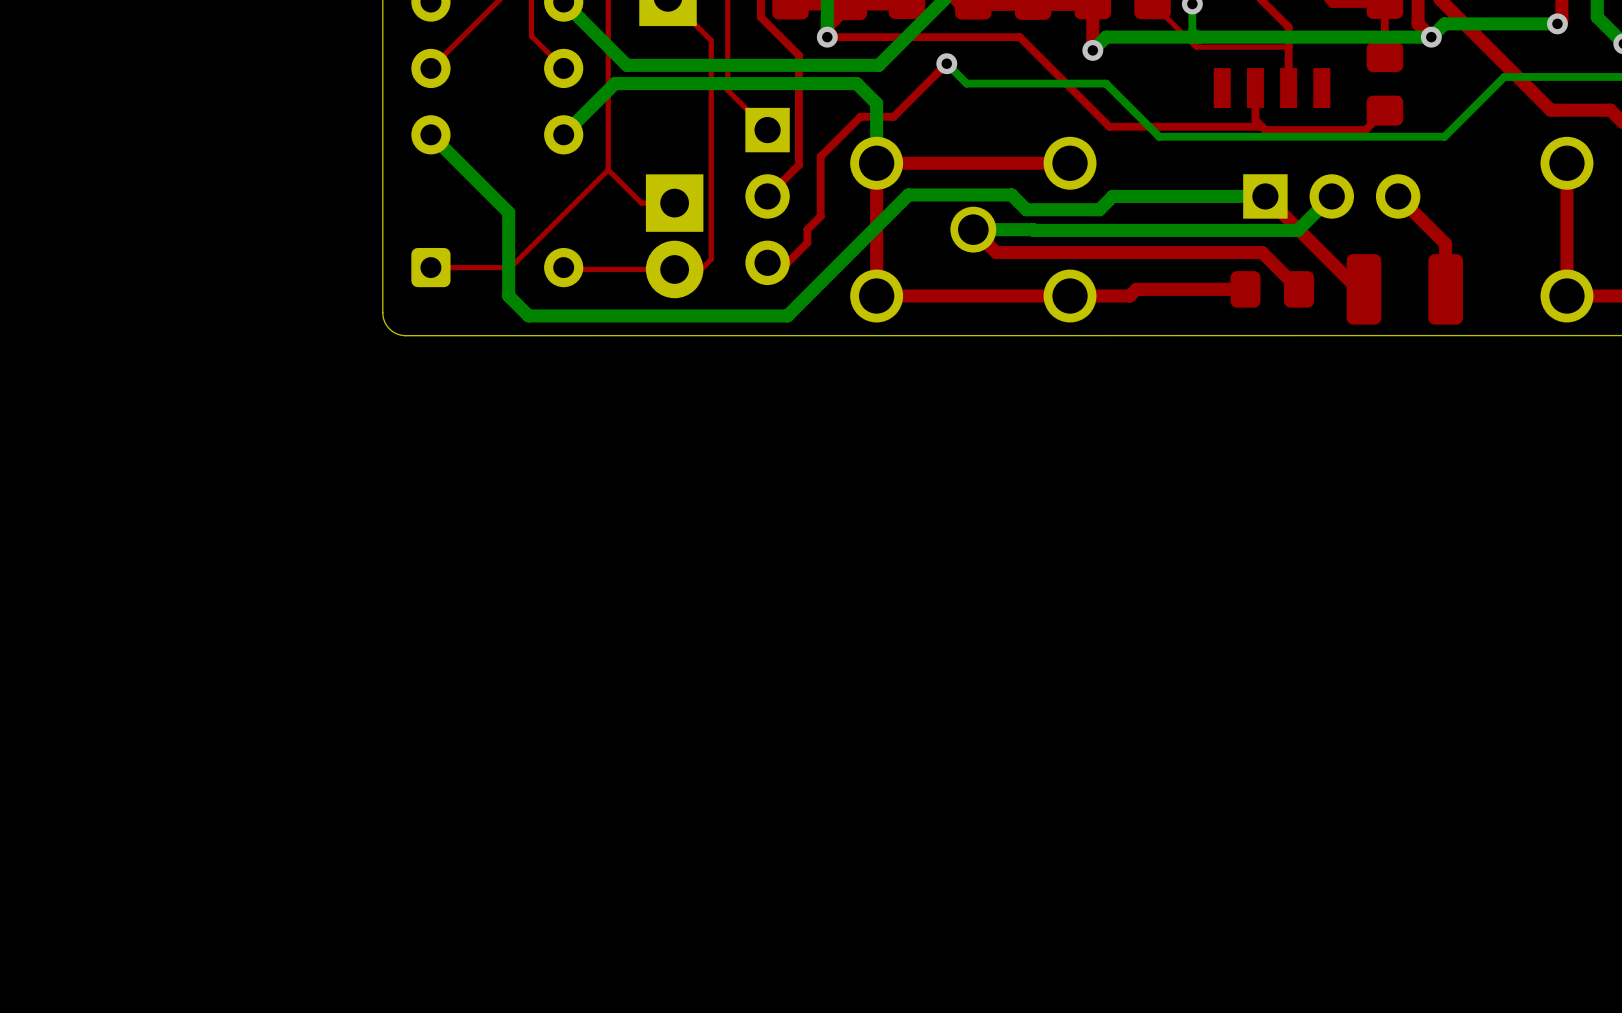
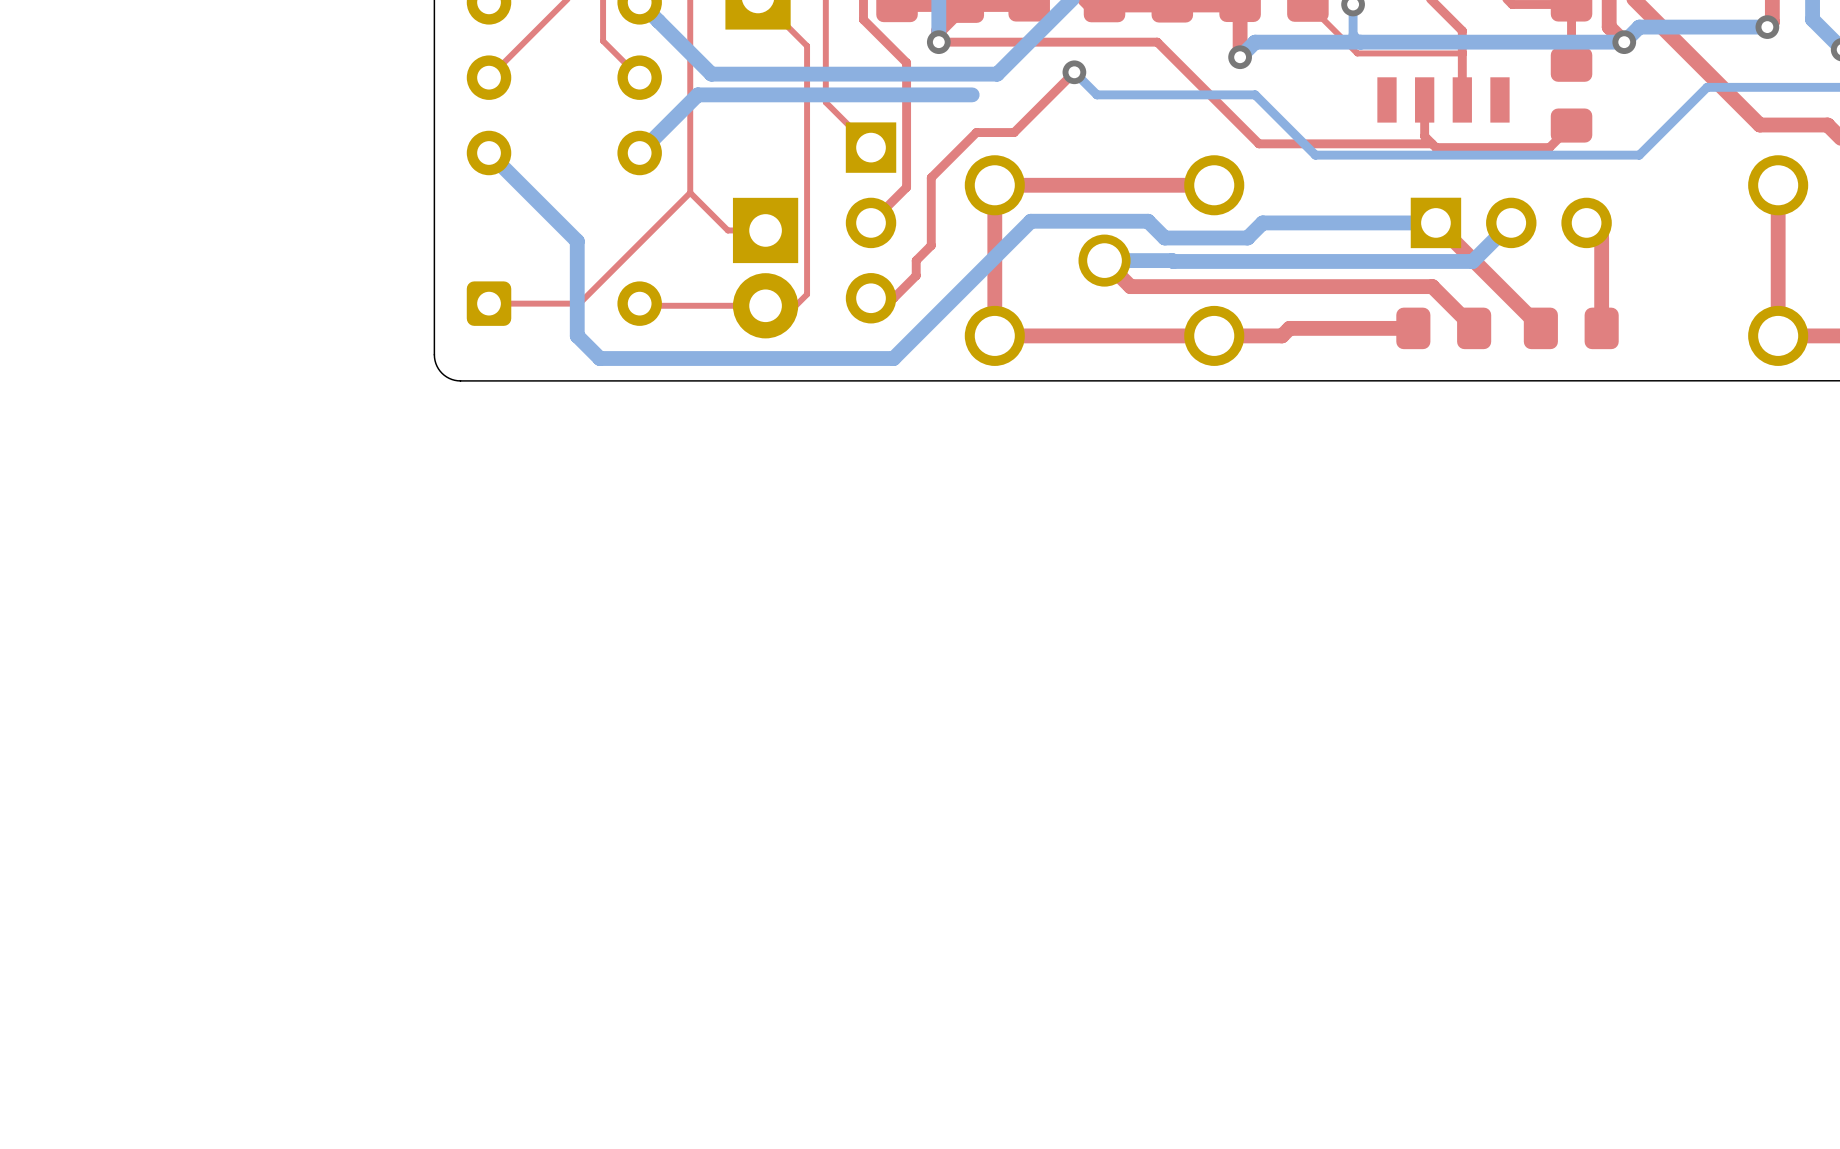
bottom track: (856, 83) (876, 103) (876, 163) -> none
top track: (1411, 209) (1445, 243) (1445, 289) -> (1601, 237) (1601, 328)
part footprint: [1346, 254, 1463, 325] -> [1523, 307, 1619, 350]

